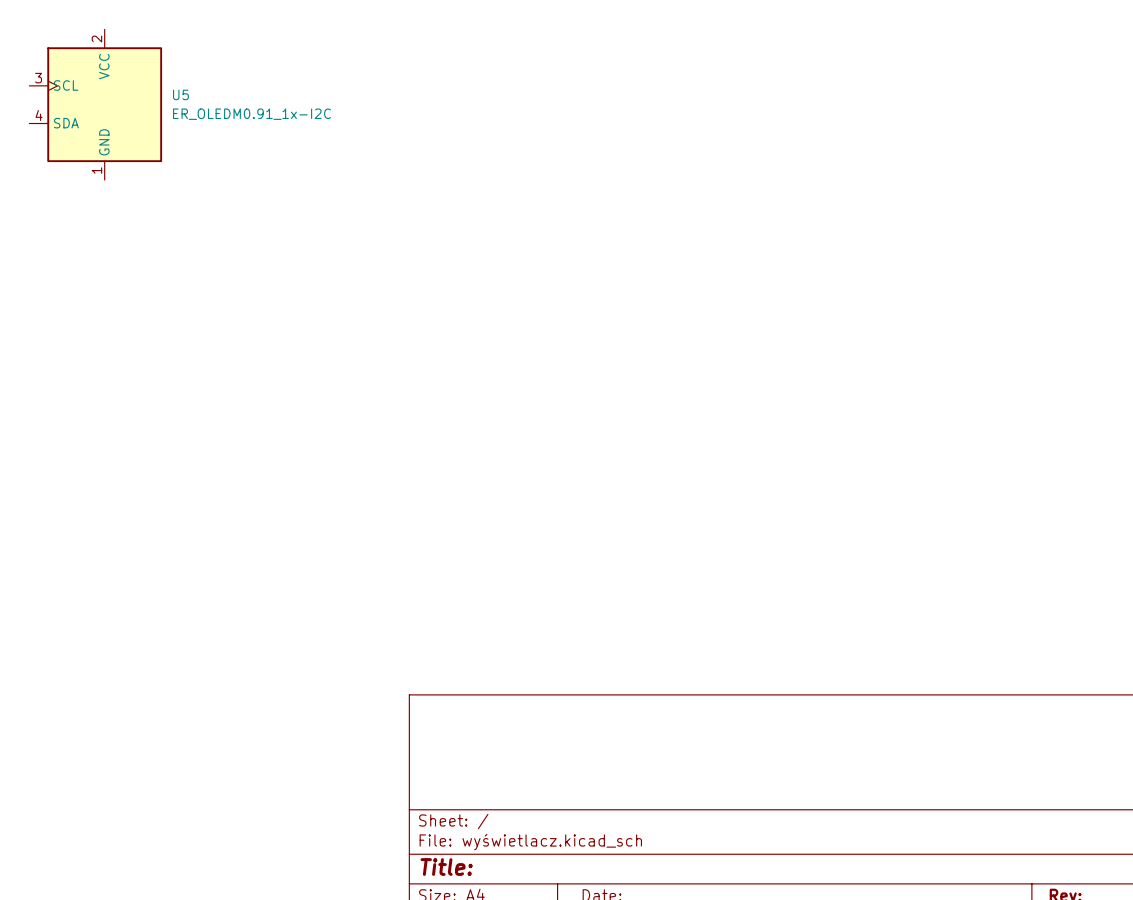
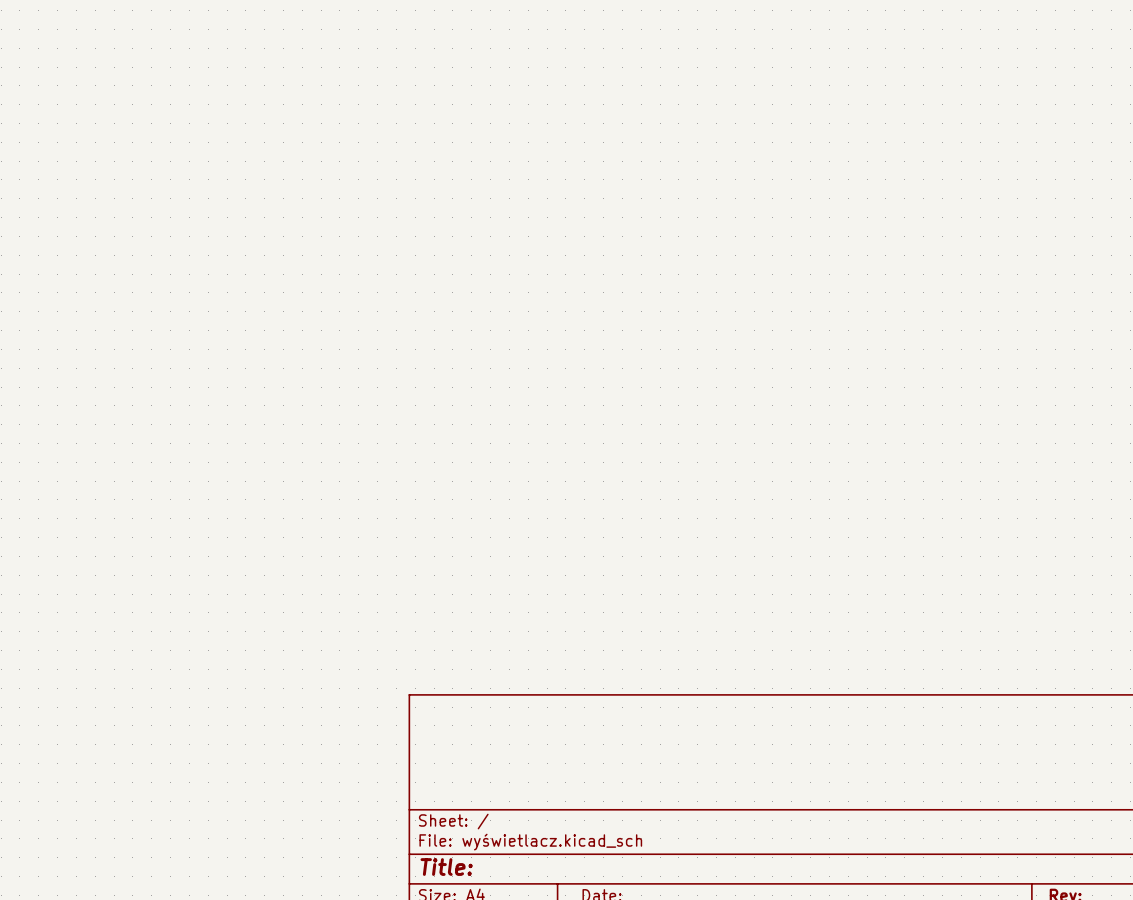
U5: ER_OLEDM0.91_1x-I2C (95, 104) -> none

